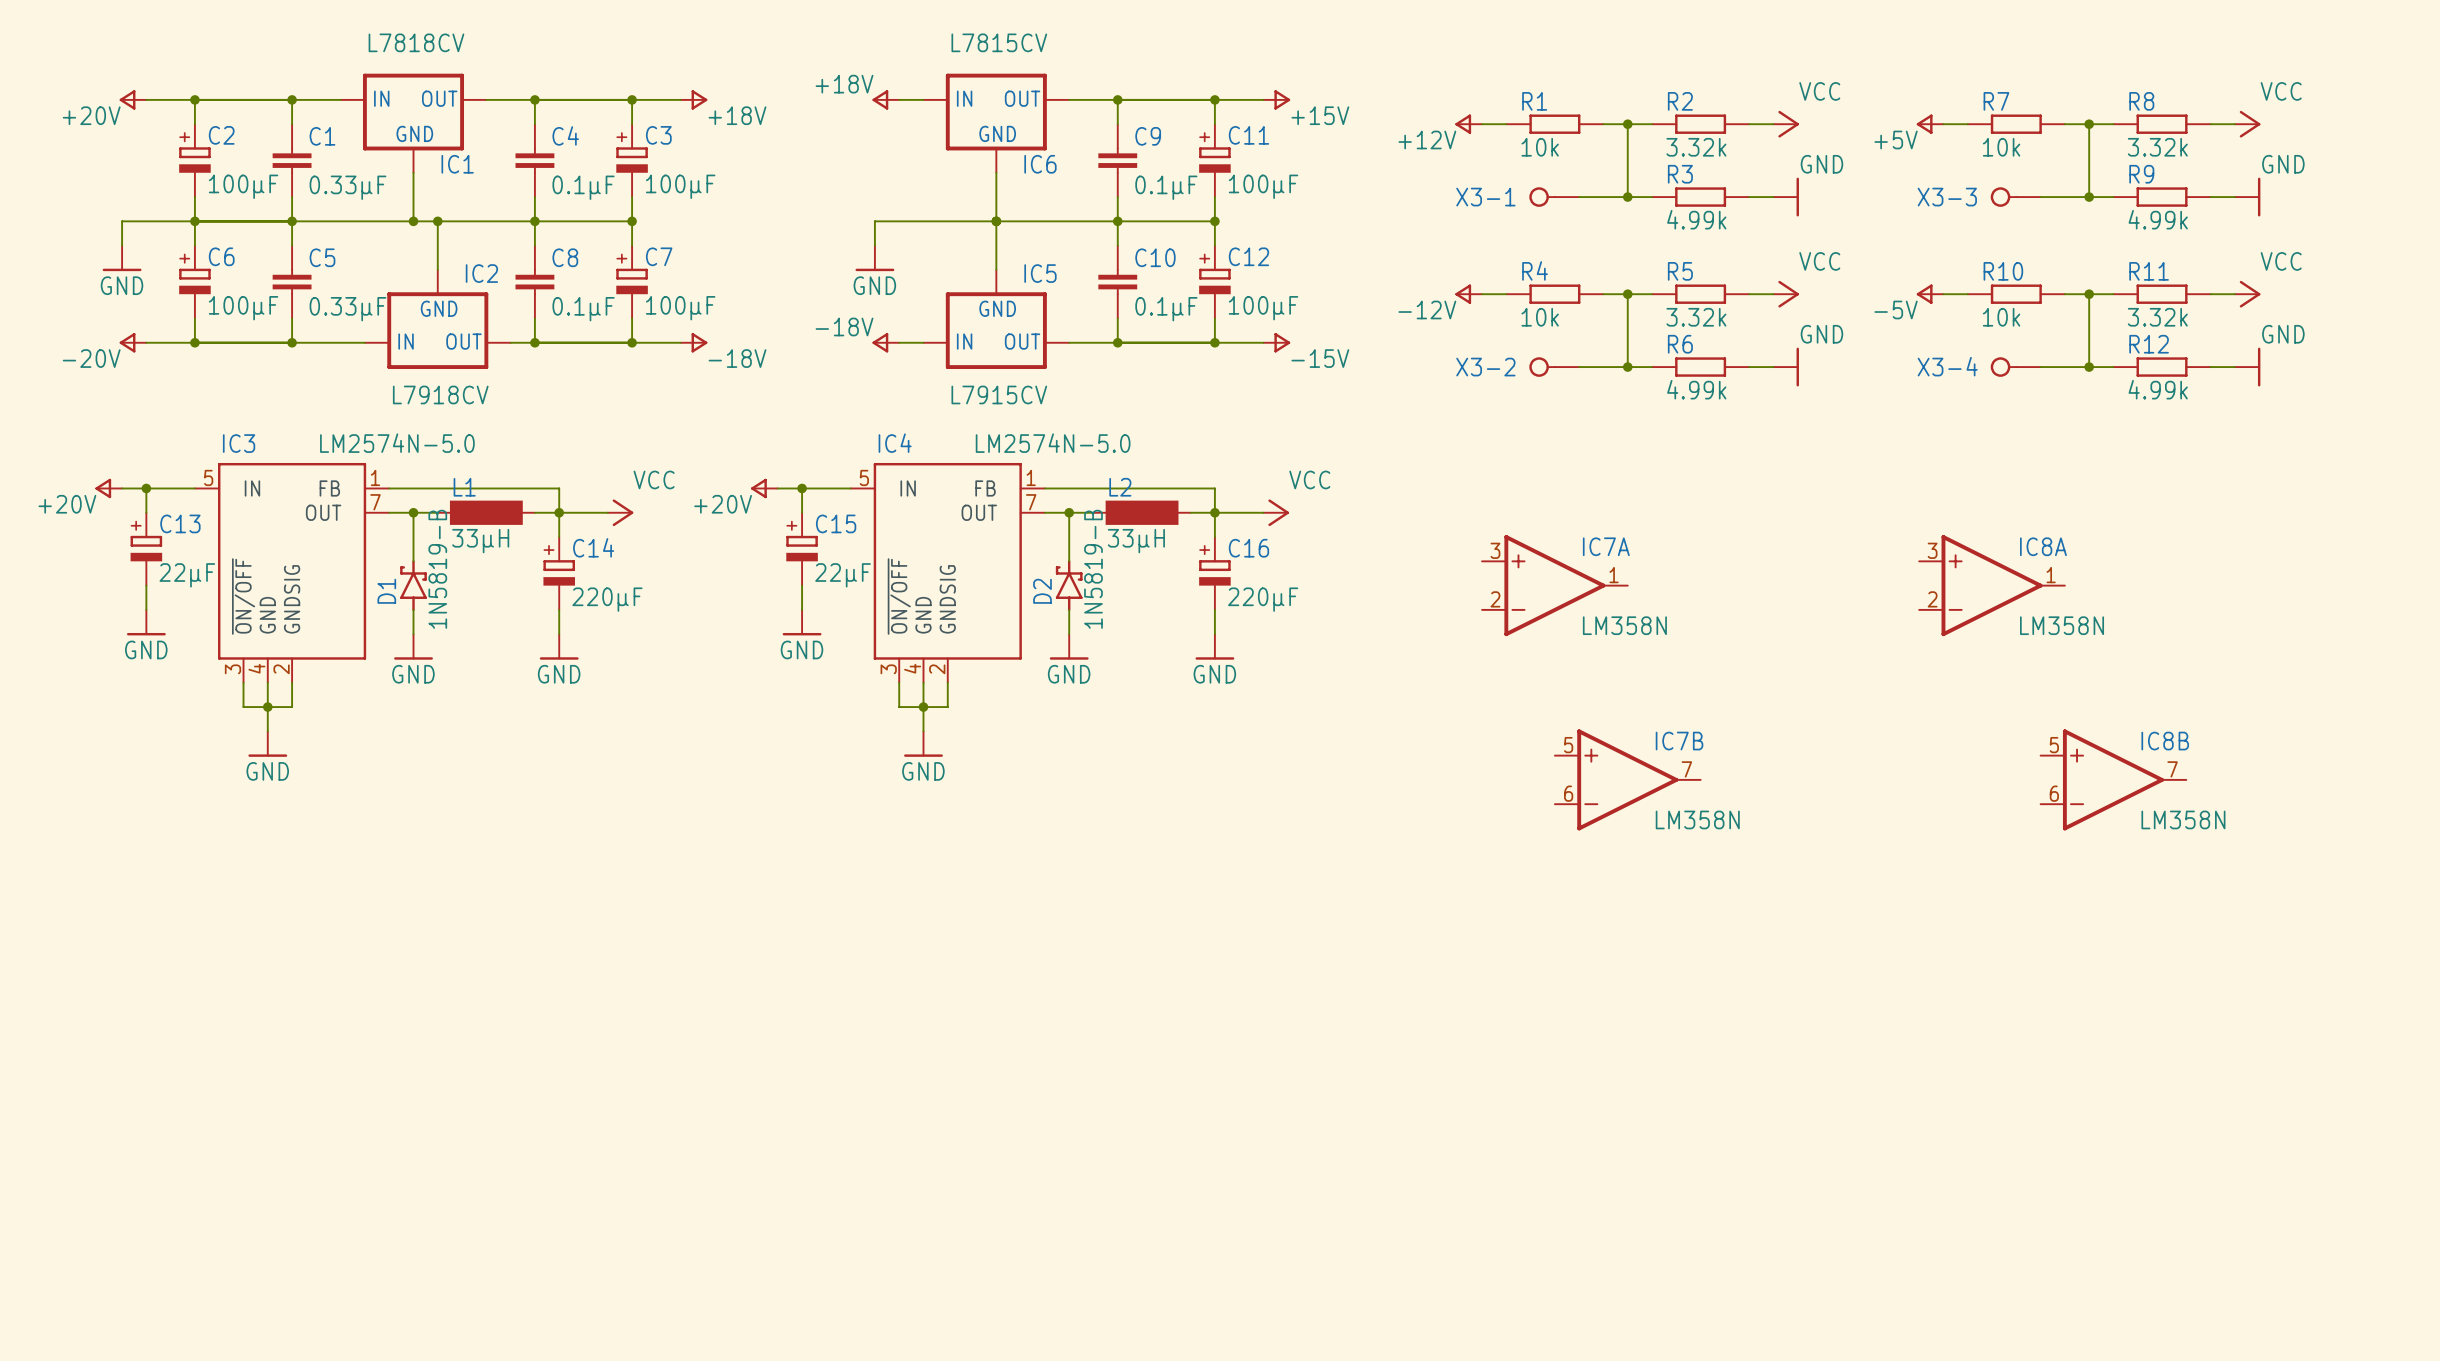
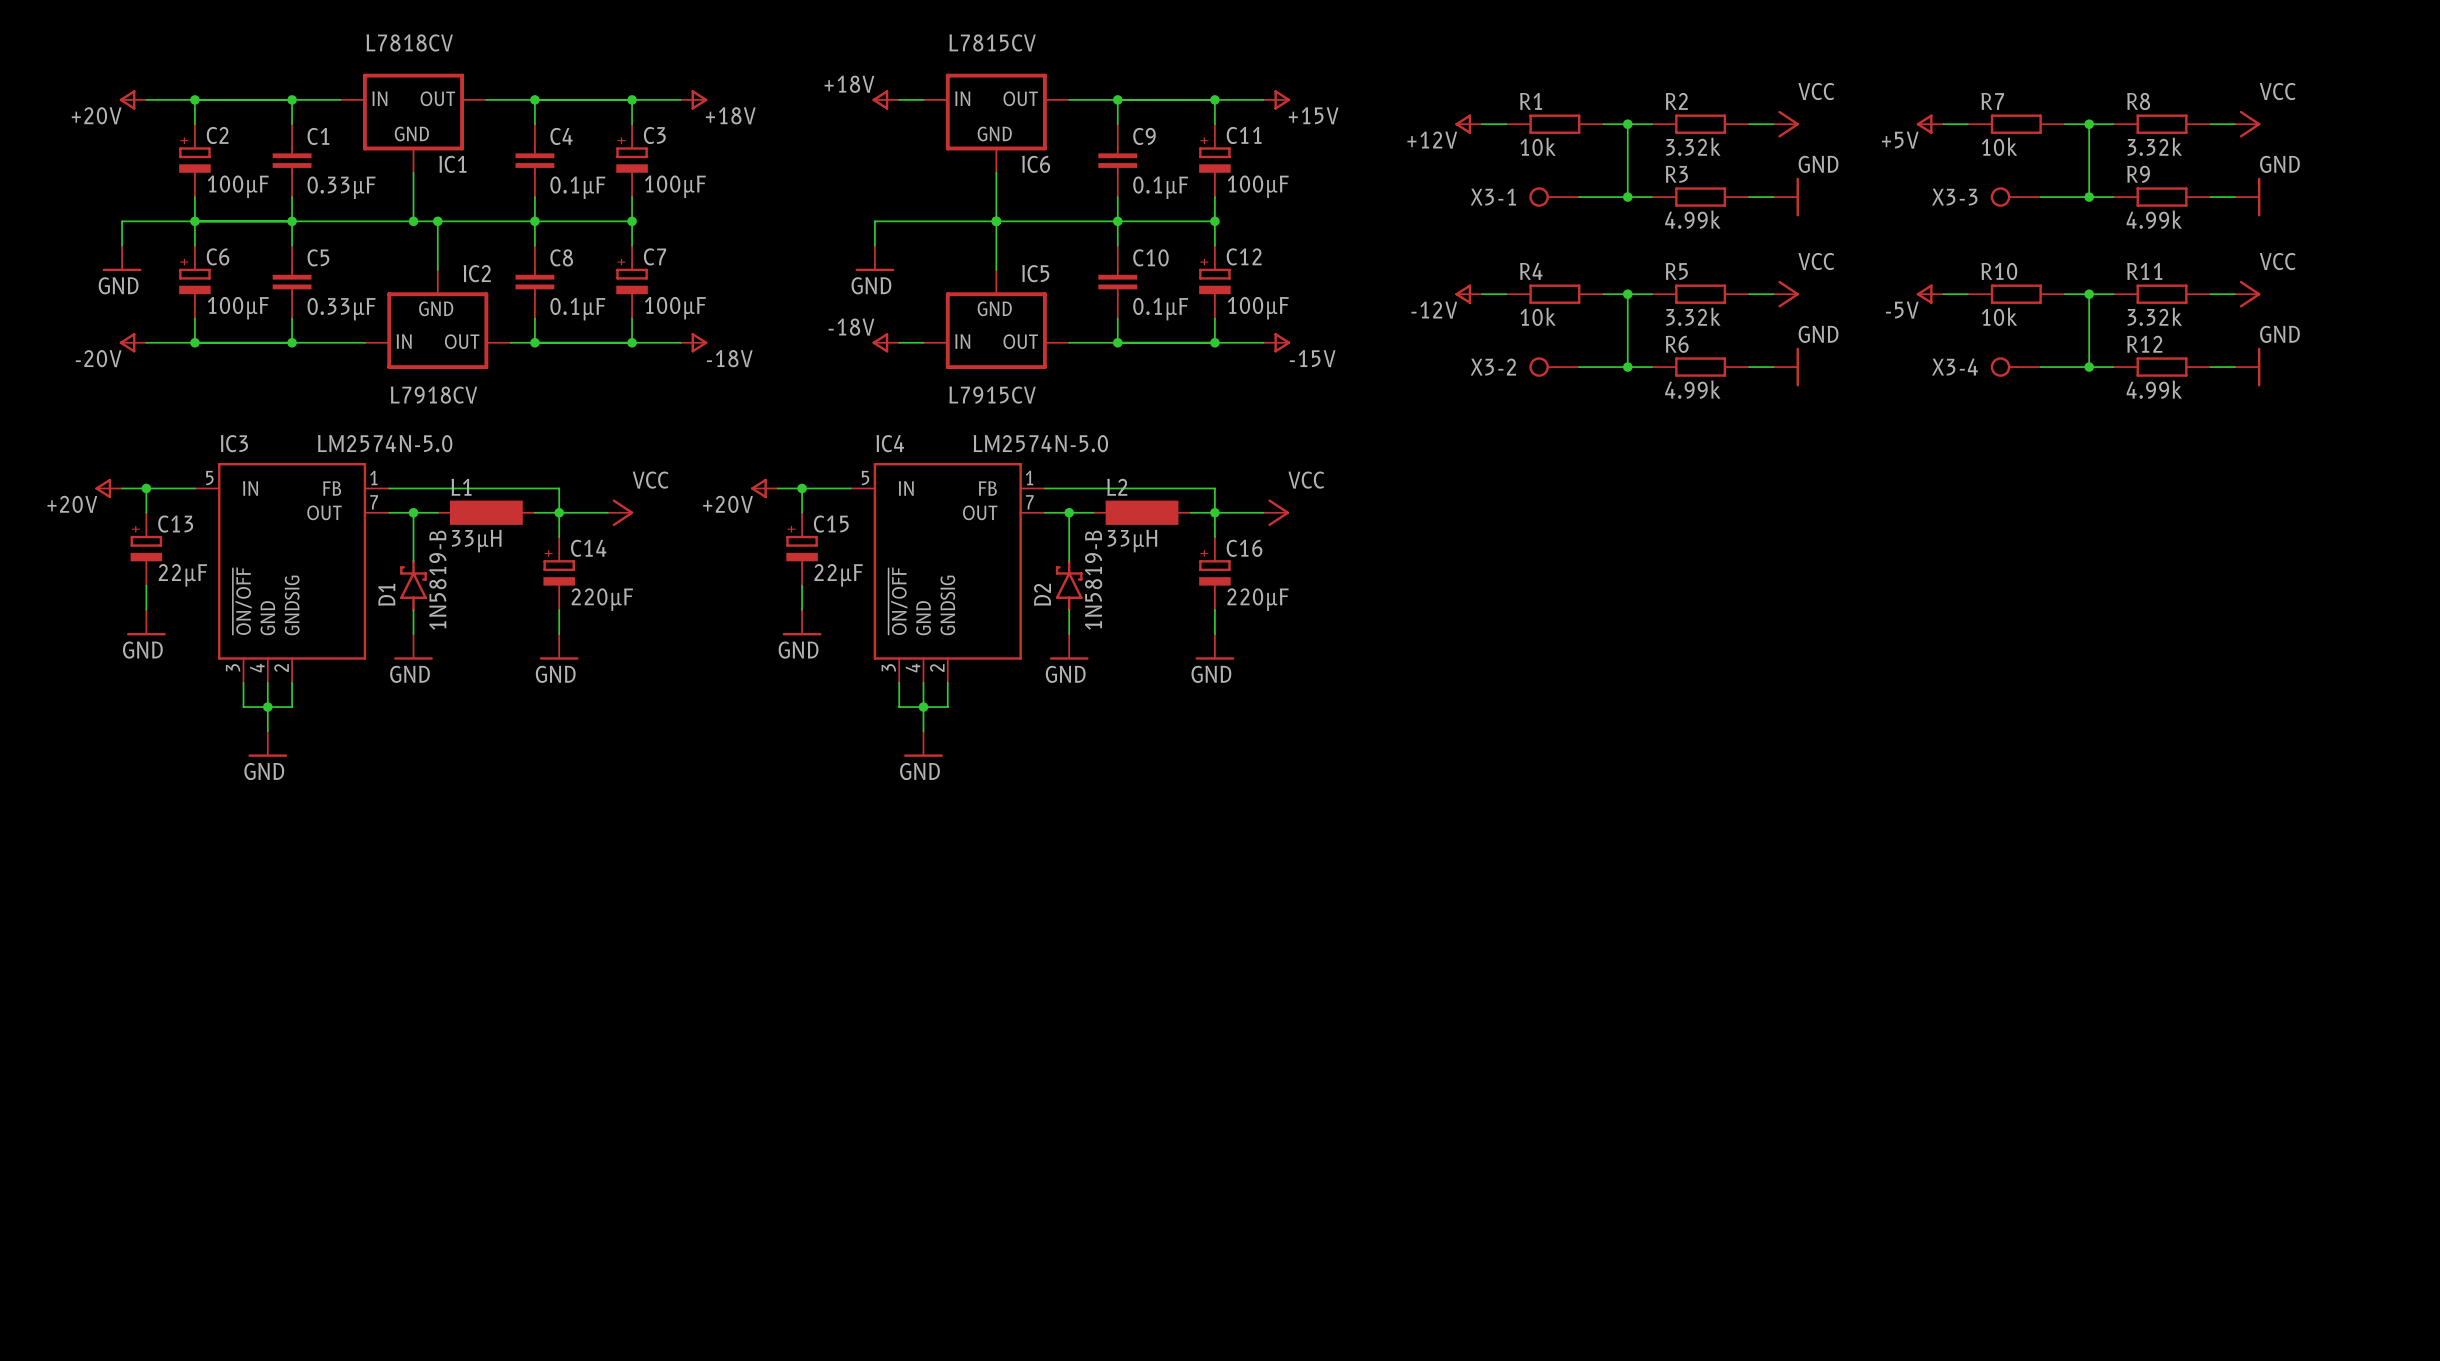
IC7A: LM358N (1554, 585) -> none
IC8A: LM358N (1992, 585) -> none
IC7B: LM358N (1627, 779) -> none
IC8B: LM358N (2113, 779) -> none

